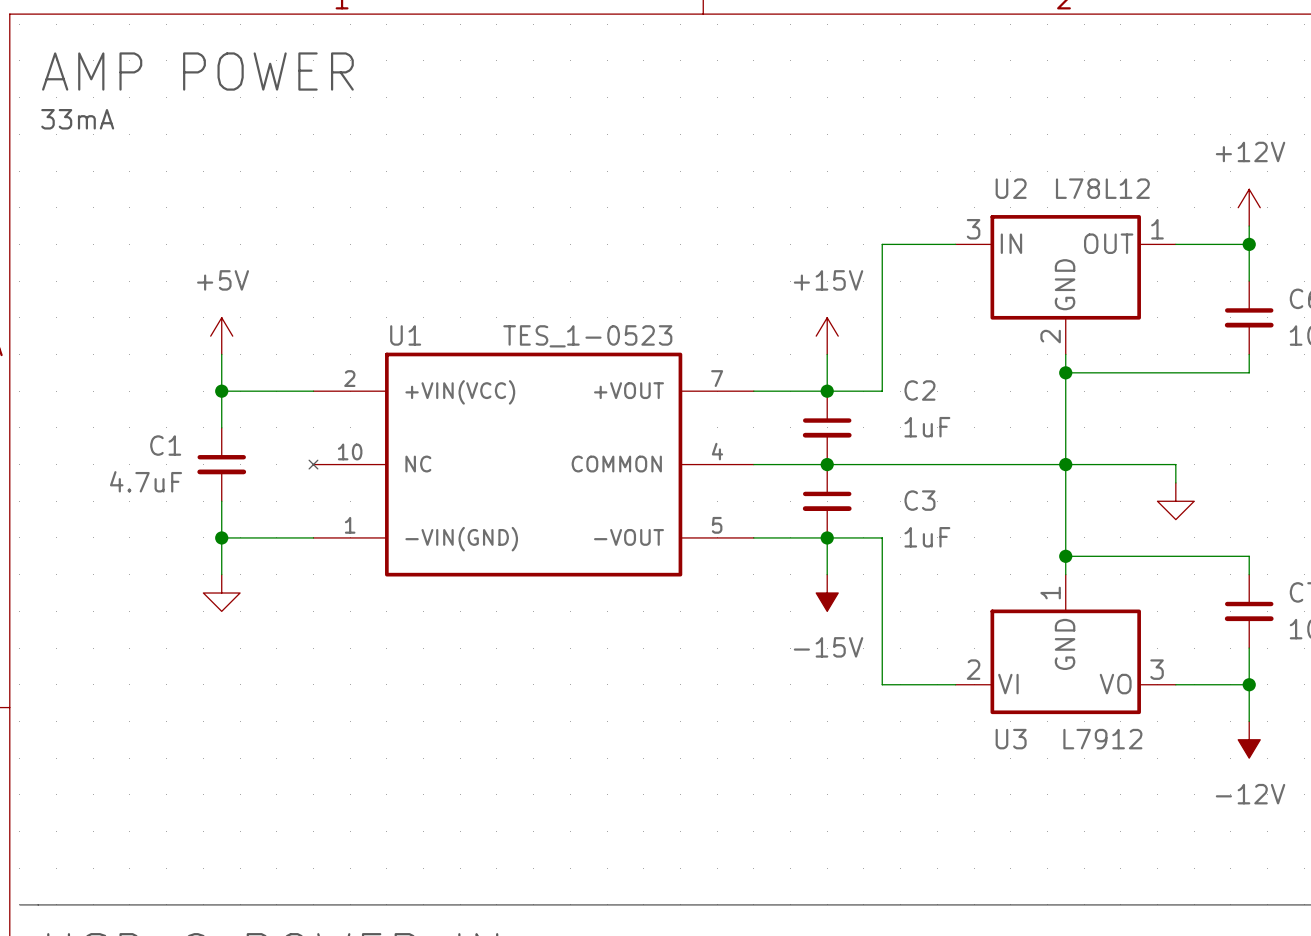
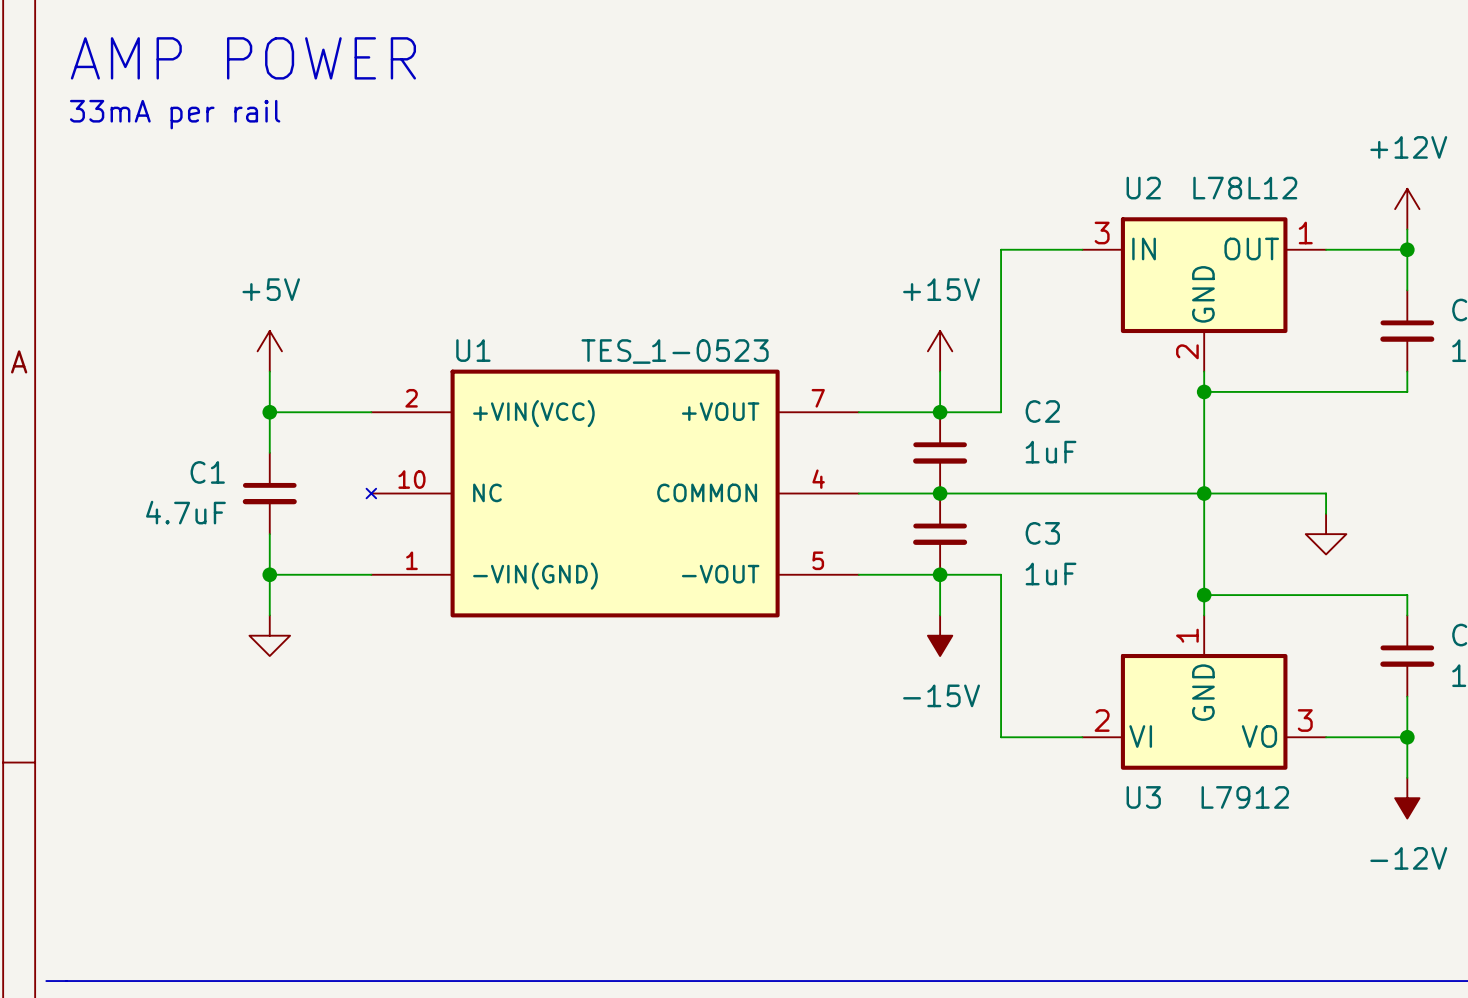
text: 33mA (77, 119) -> 33mA per rail (175, 114)

